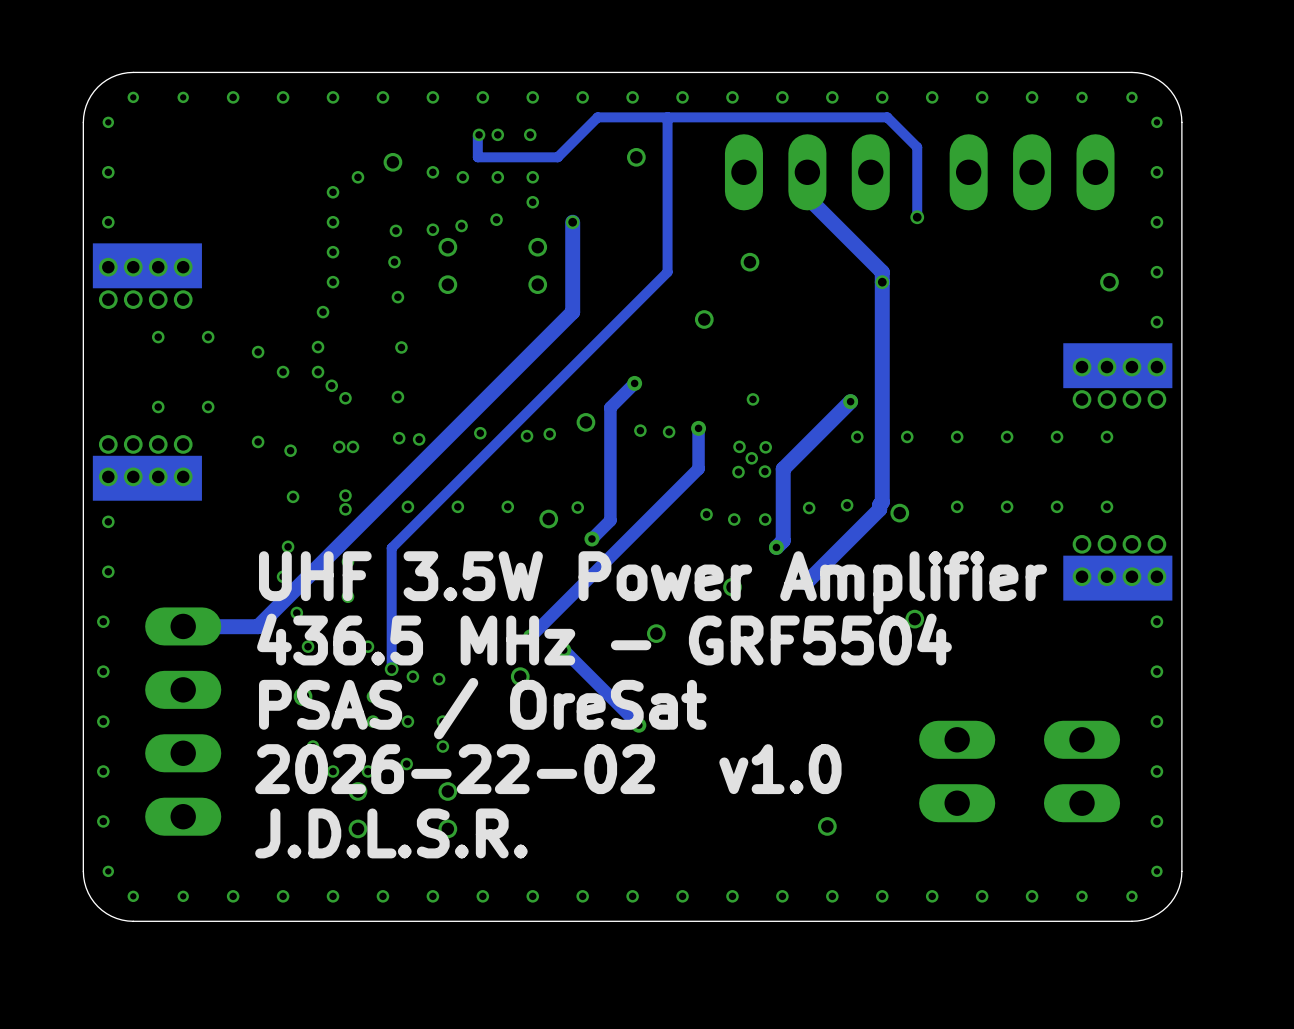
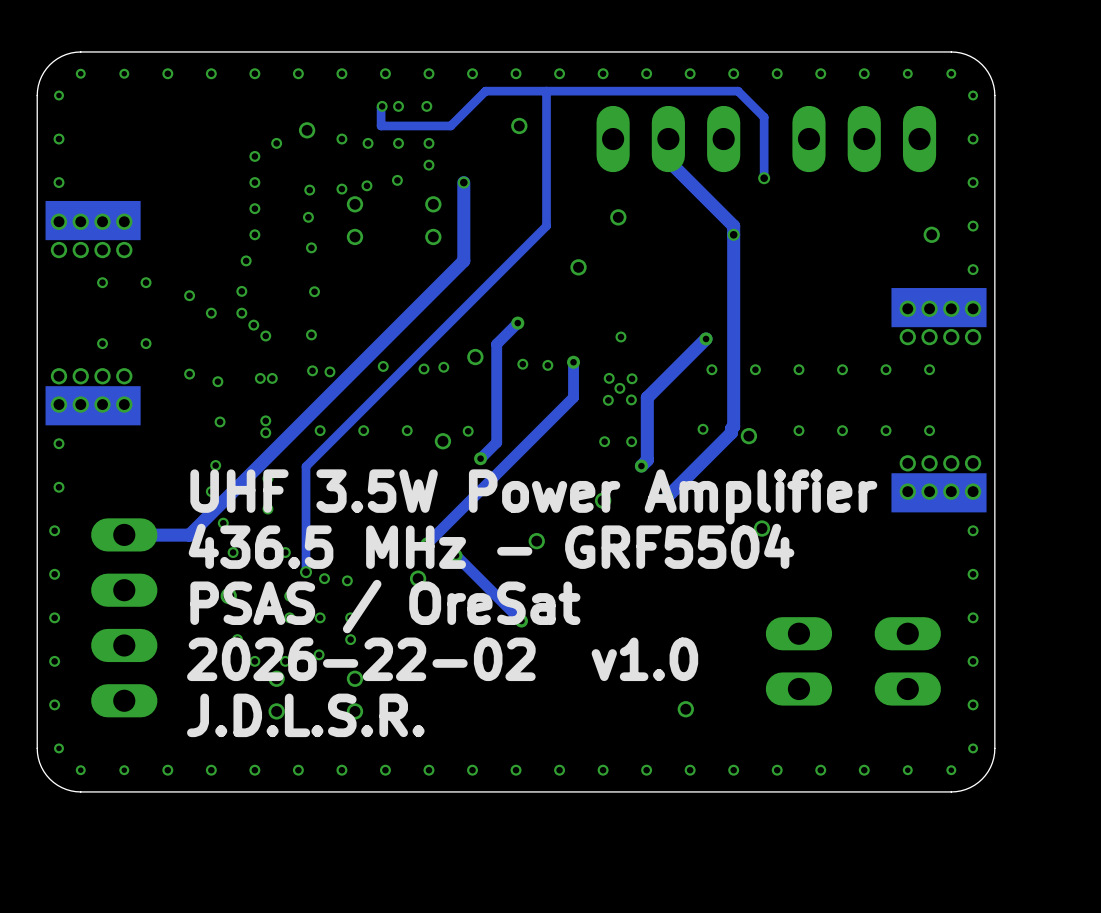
via: (809, 508) -> none
via: (706, 514) -> none

